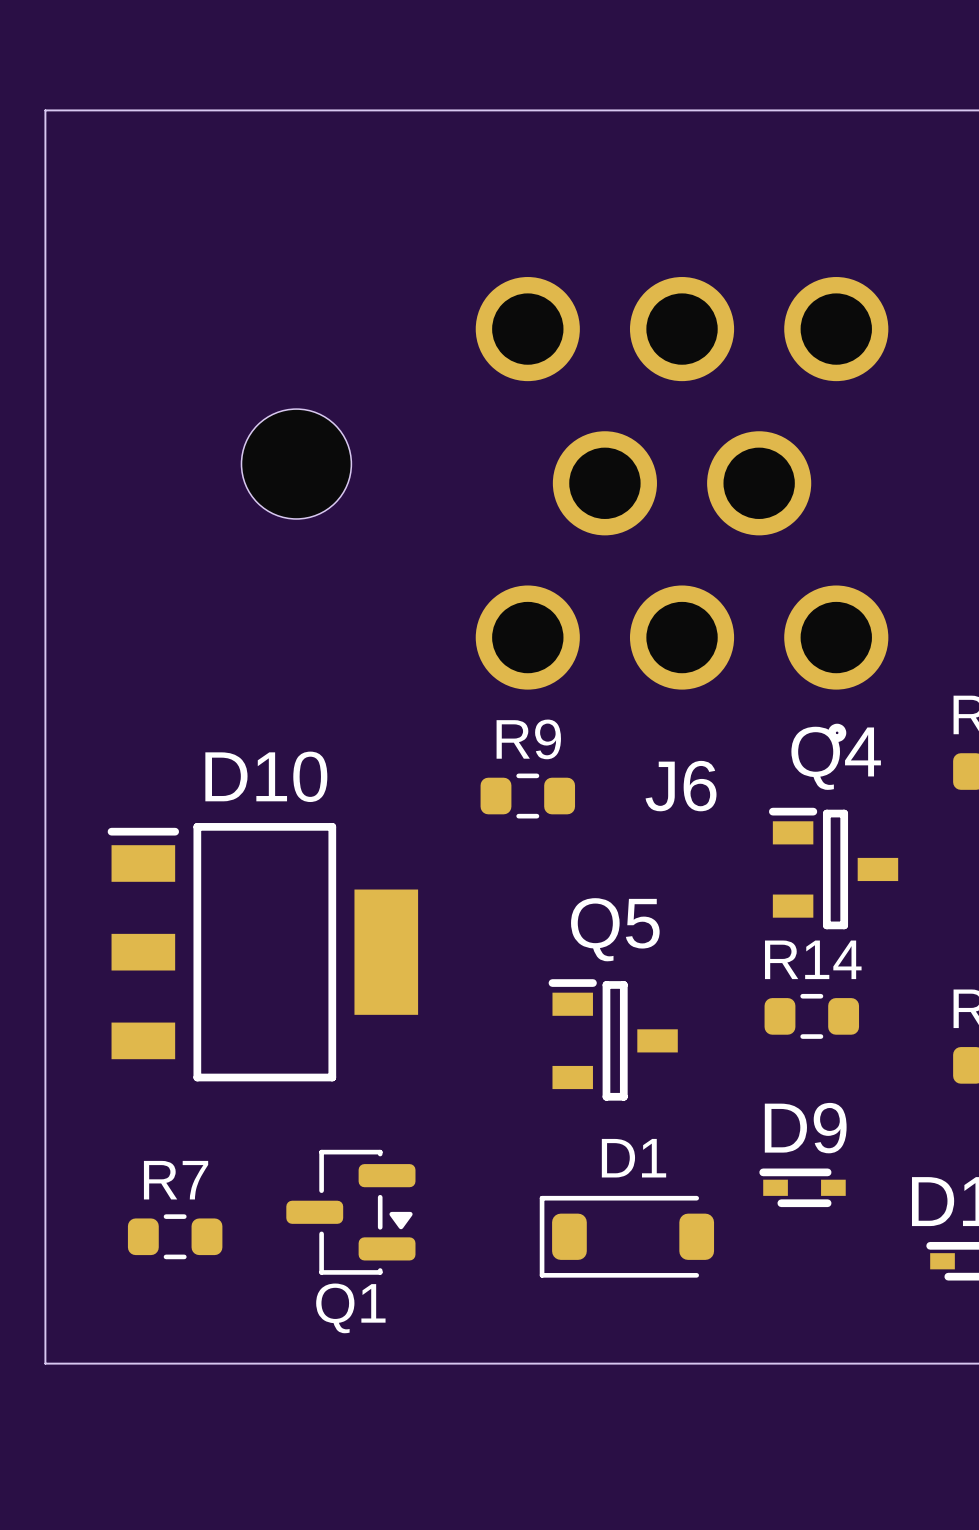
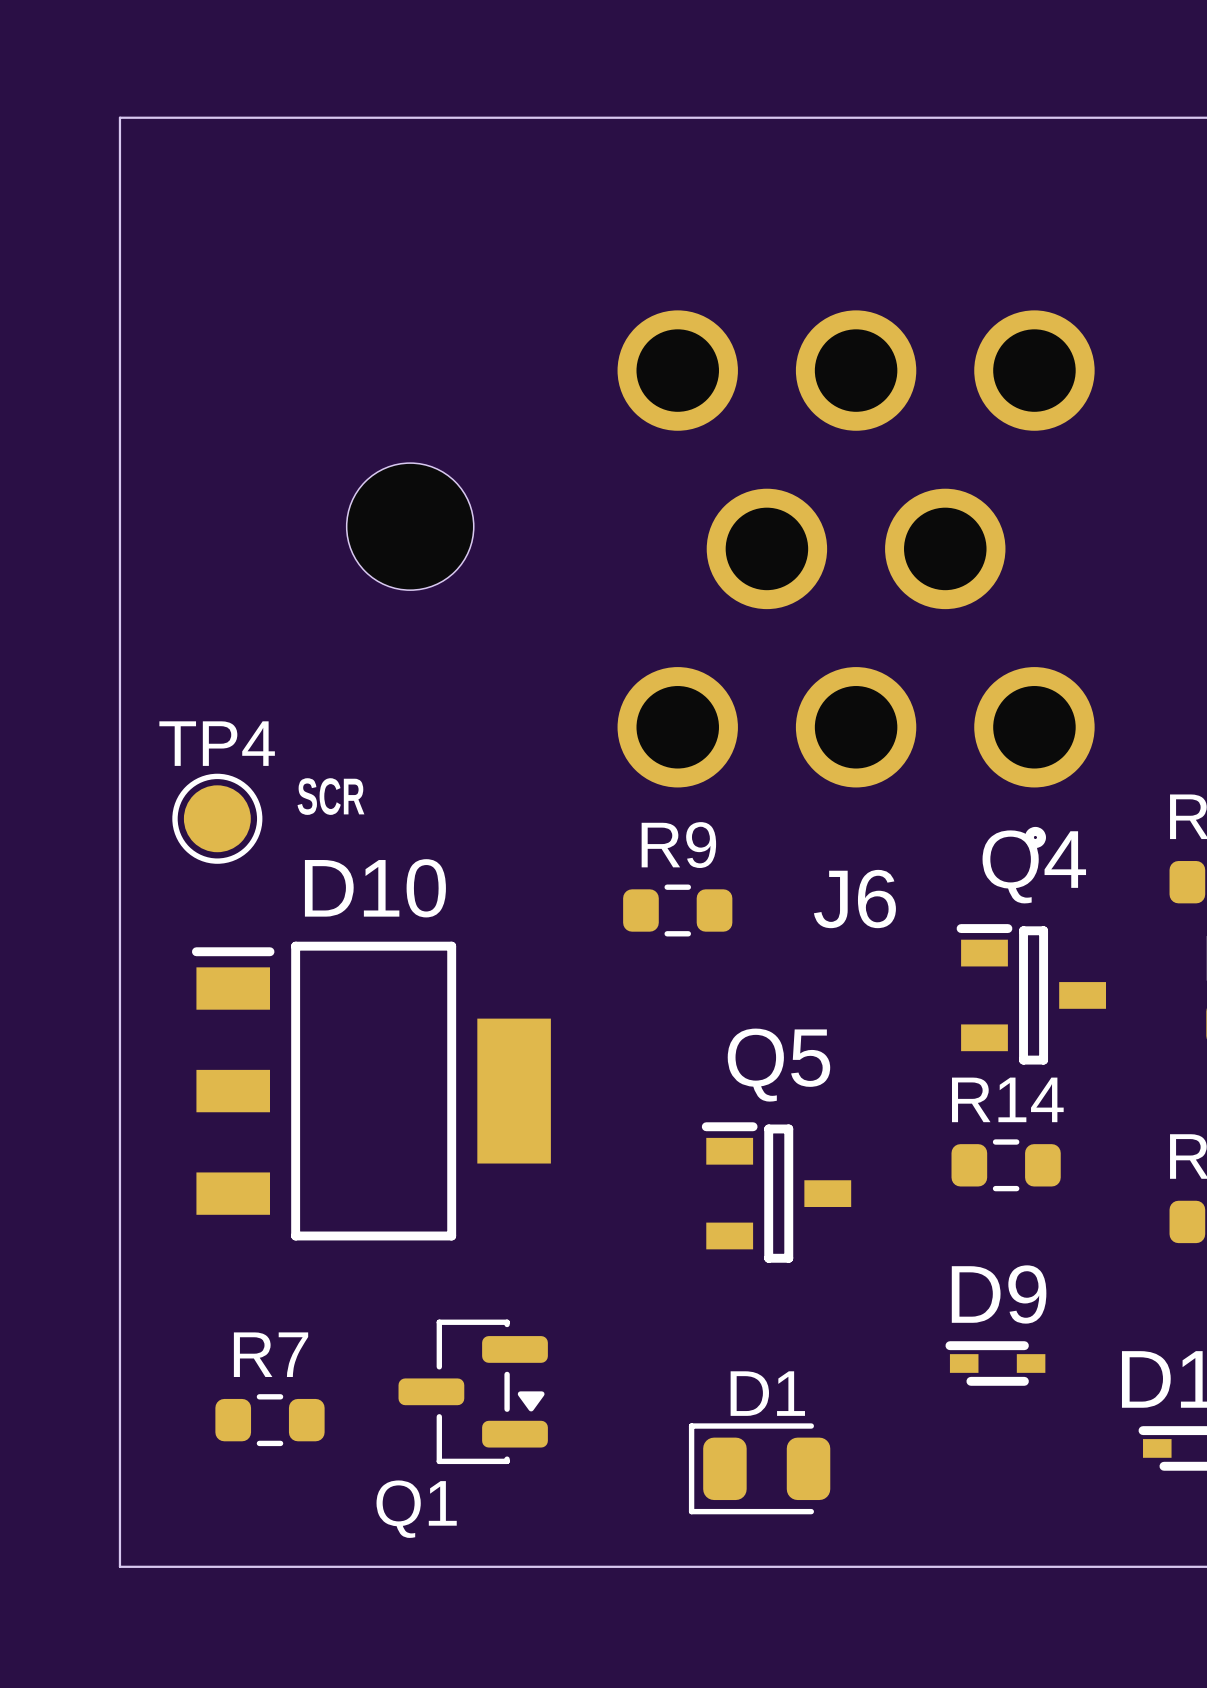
text: none -> SCR (330, 796)
TP4: none -> (217, 818)
D1 footprint: [539, 1195, 715, 1278] -> [688, 1423, 831, 1515]
Q1 name position: Q1 (350, 1308) -> Q1 (416, 1509)

